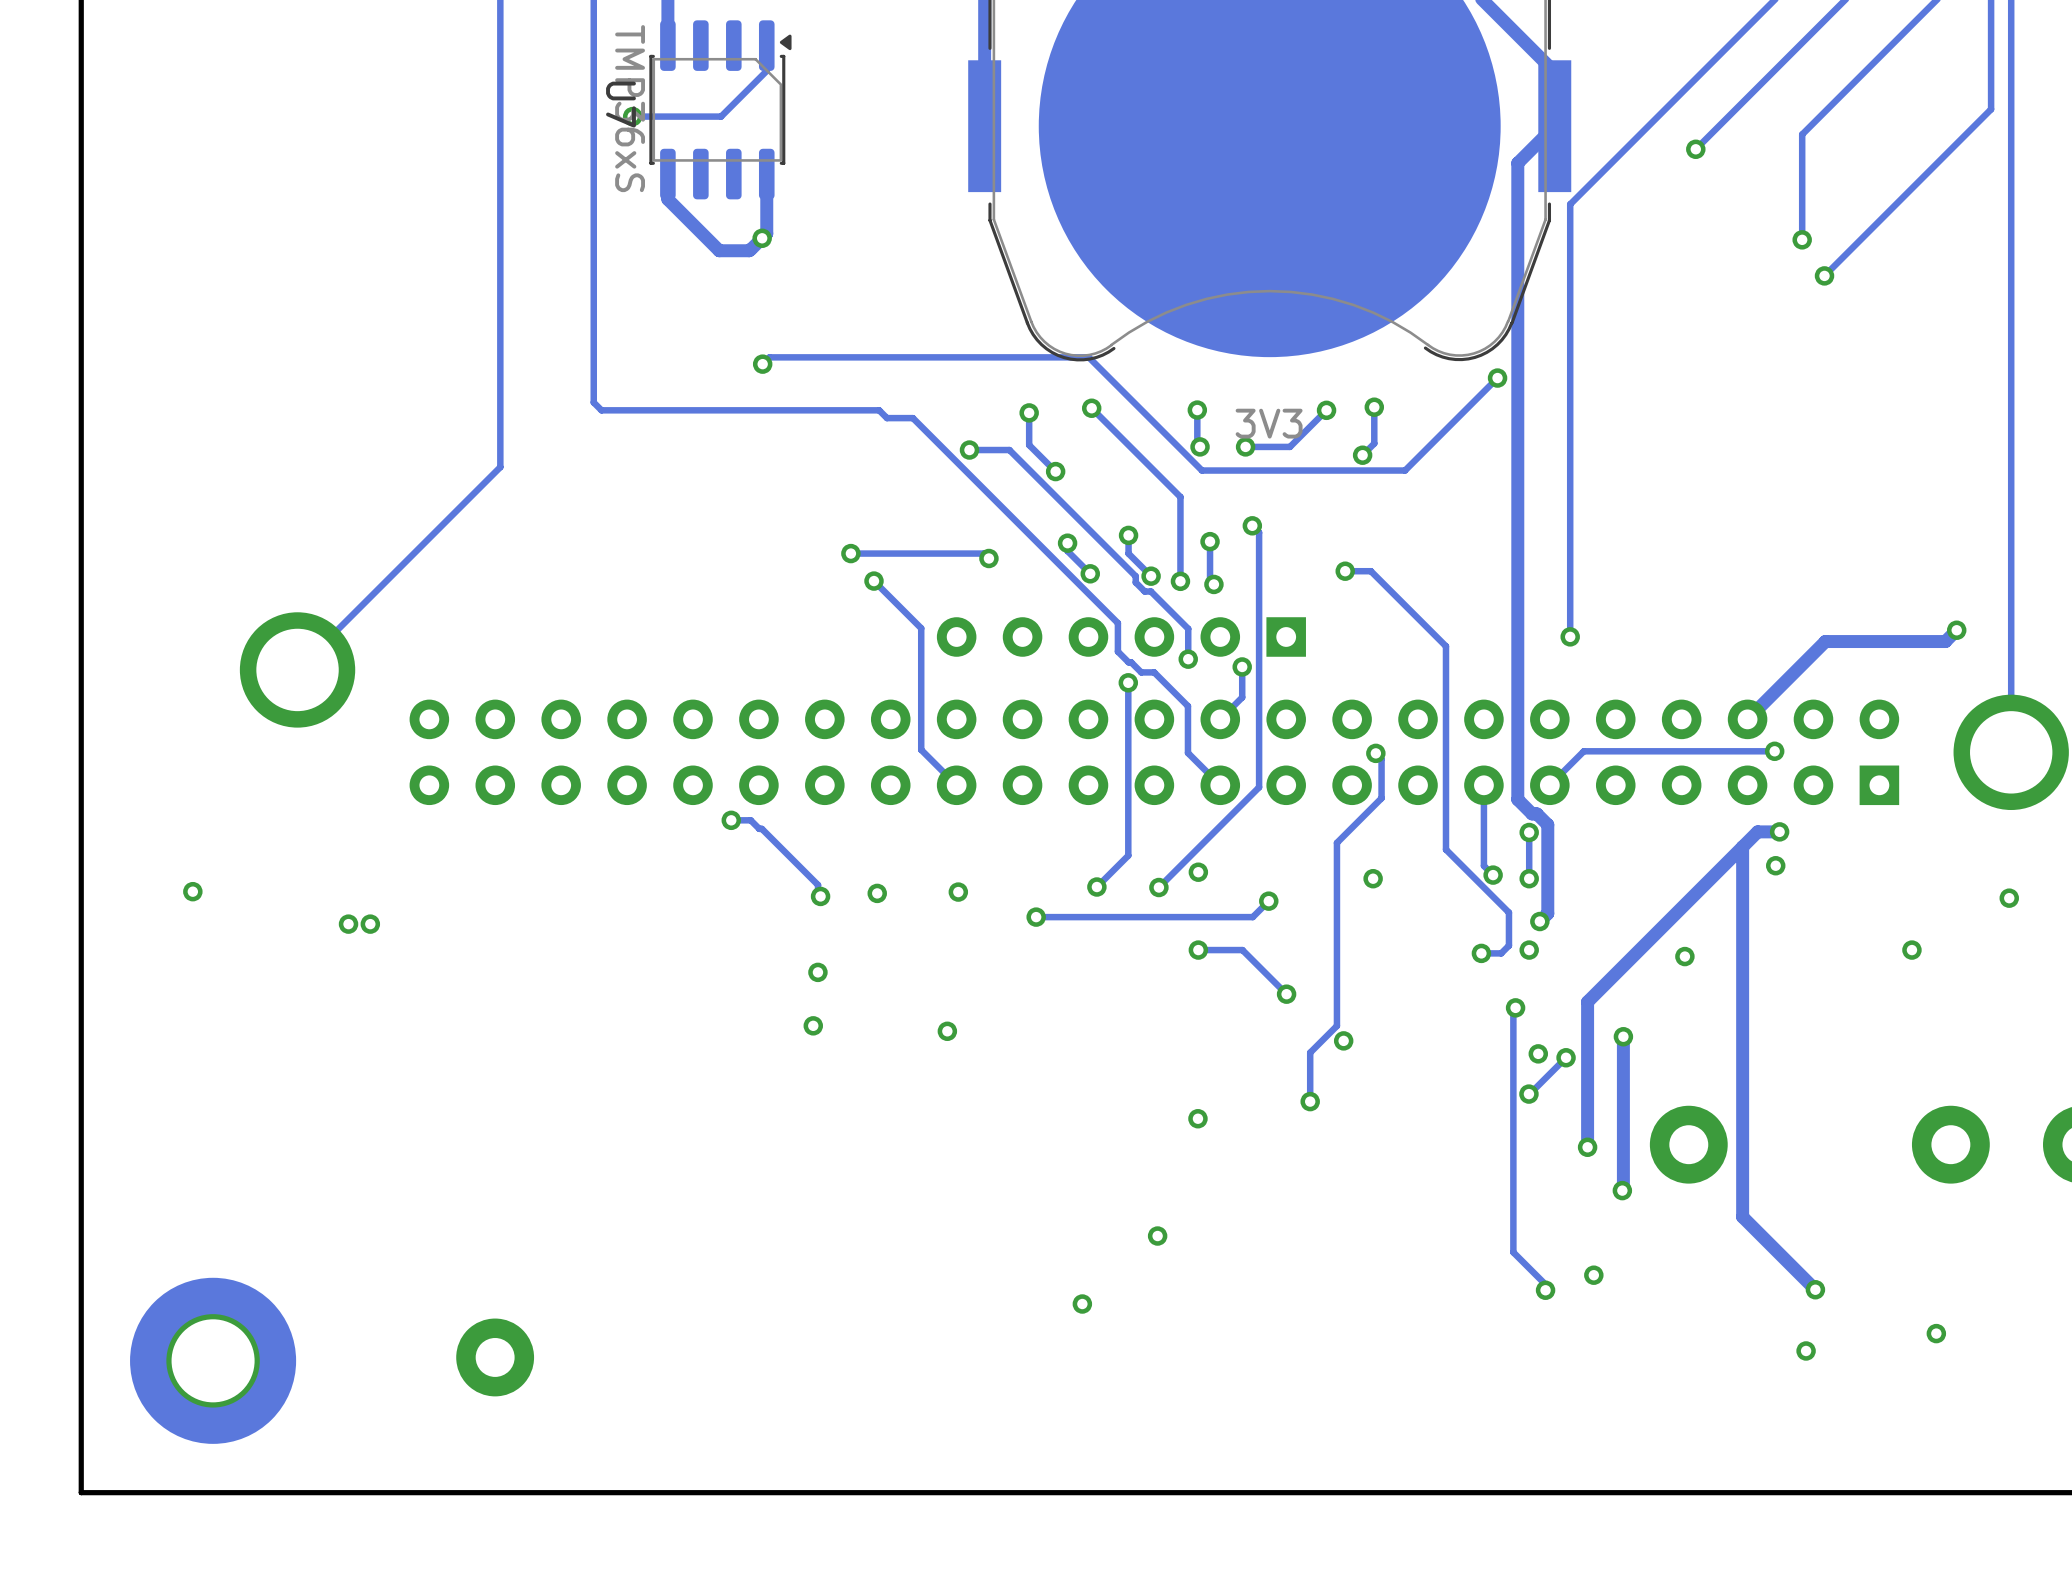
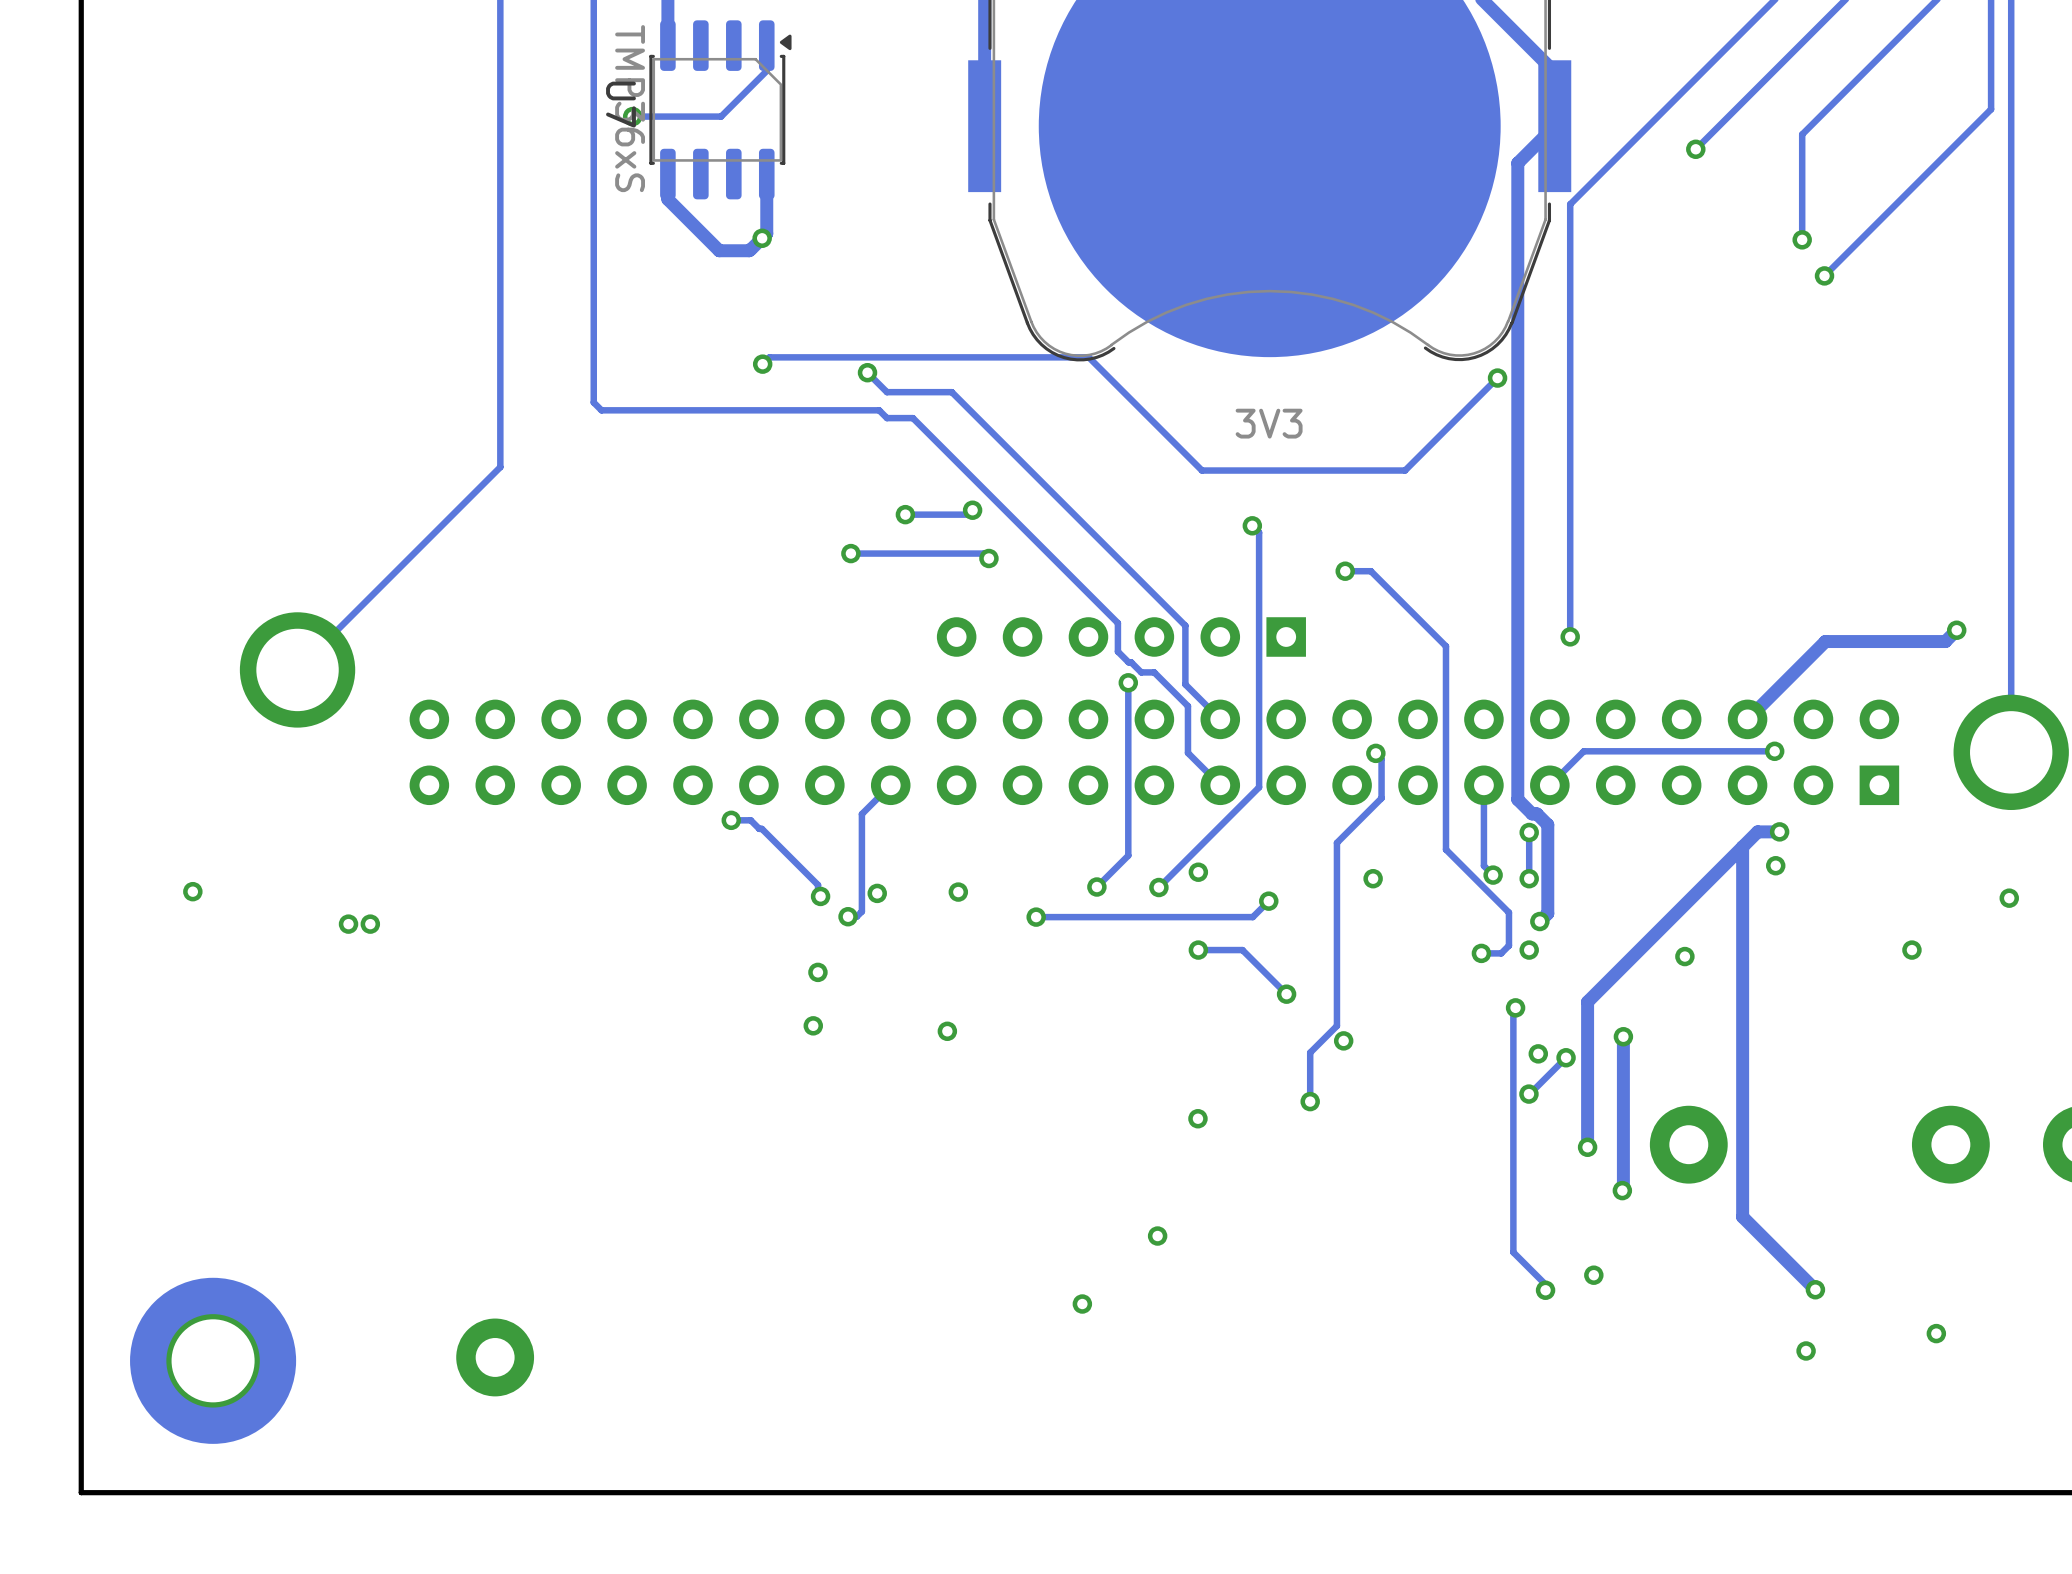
via: none -> (867, 372)
track: (1374, 407) (1374, 443) (1362, 455) -> none
via: (1374, 407) -> none
track: (1091, 408) (1180, 497) (1180, 581) -> none
via: (1091, 408) -> none
track: (1197, 410) (1197, 444) (1200, 446) -> none
via: (1197, 410) -> none
track: (1326, 410) (1289, 446) (1245, 446) -> none
via: (1326, 410) -> none
track: (1029, 412) (1029, 445) (1055, 471) -> none
via: (1029, 412) -> none
via: (1200, 446) -> none
via: (1245, 446) -> none
track: (969, 450) (1009, 450) (1135, 576) (1135, 582) (1144, 591) (1150, 591) (1188, 628) (1188, 659) -> none
via: (969, 450) -> none
via: (1362, 455) -> none
via: (1055, 471) -> none
track: none -> (972, 510) (968, 514) (905, 514)
via: none -> (972, 510)
via: none -> (905, 514)
track: (1128, 535) (1128, 553) (1151, 576) -> none
via: (1128, 535) -> none
track: (1210, 541) (1210, 580) (1213, 584) -> none
via: (1210, 541) -> none
track: (1067, 543) (1067, 551) (1090, 573) -> none
via: (1067, 543) -> none
via: (1090, 573) -> none
via: (1151, 576) -> none
track: (873, 581) (921, 628) (921, 749) (956, 785) -> none
via: (873, 581) -> none
via: (1180, 581) -> none
via: (1213, 584) -> none
via: (1188, 659) -> none
track: (1242, 666) (1242, 697) (1220, 719) -> (867, 372) (886, 392) (951, 392) (1185, 625) (1185, 684) (1220, 719)
via: (1242, 666) -> none
track: none -> (890, 785) (861, 814) (861, 911) (856, 916) (848, 916)
via: none -> (848, 916)

